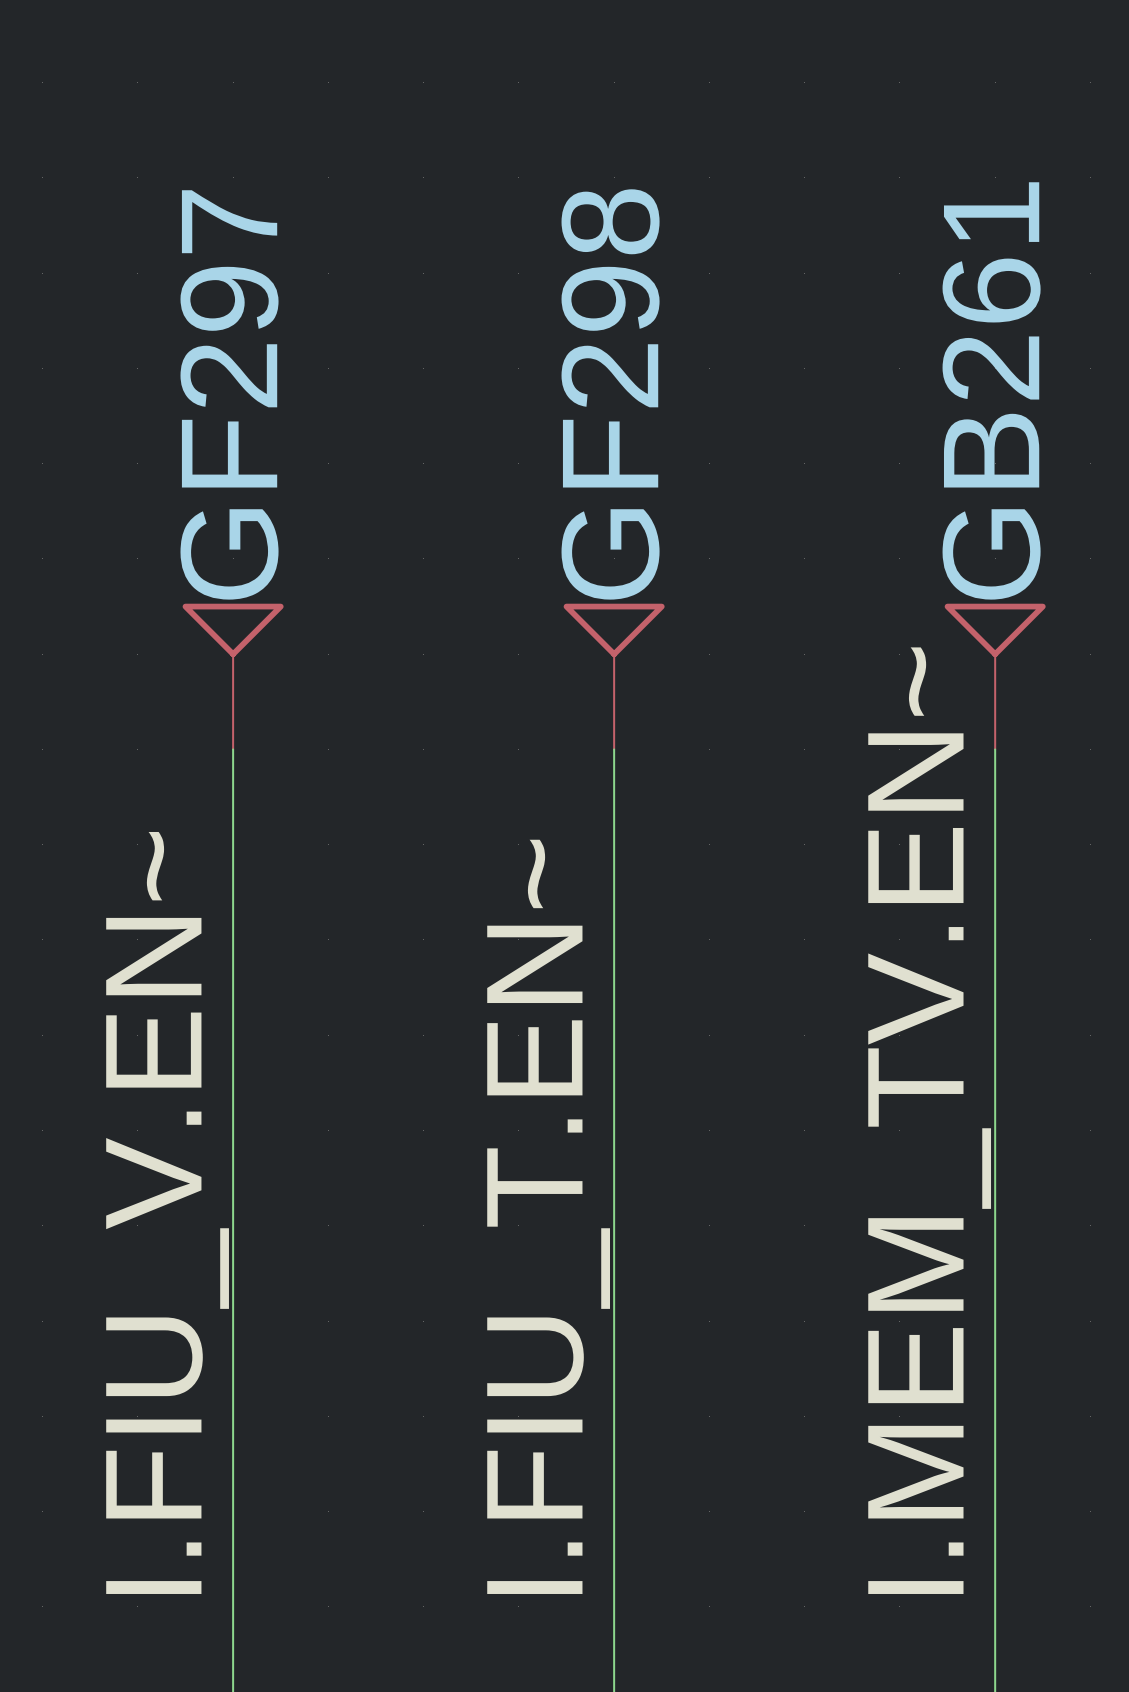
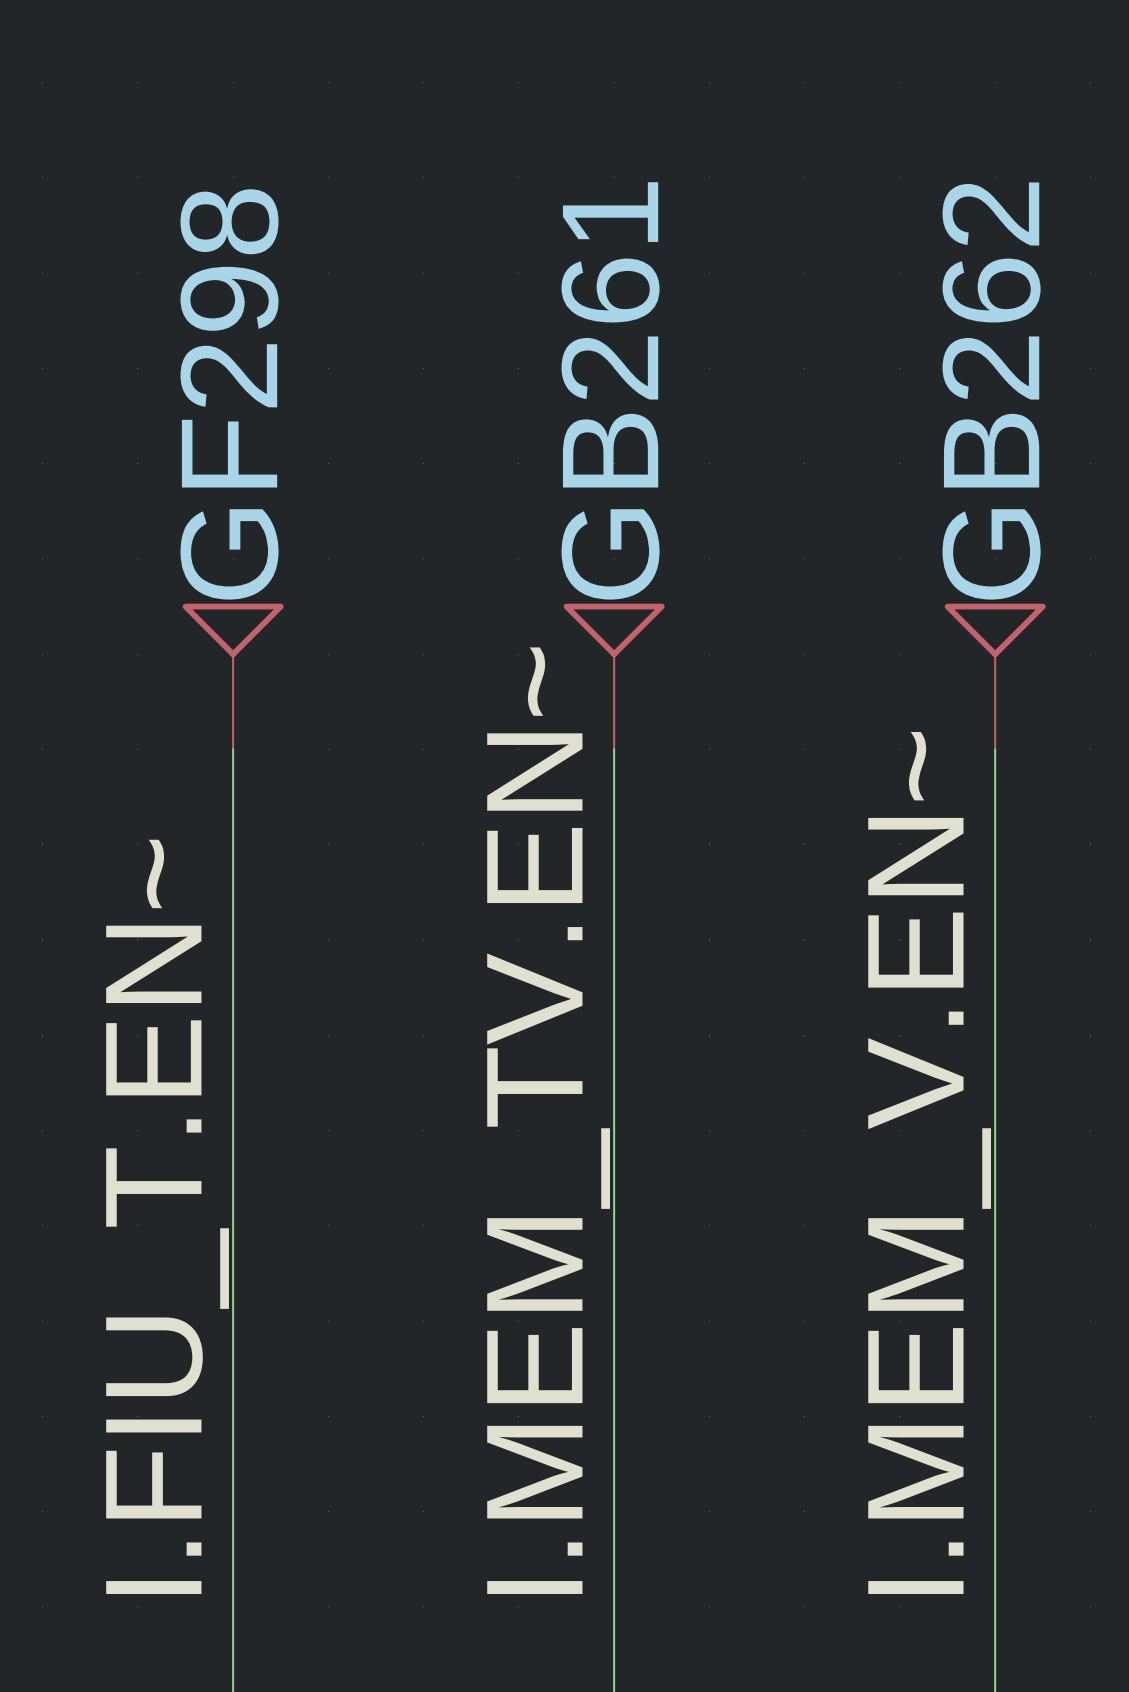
GB261 name: GB261 (991, 390) -> GB262 (991, 391)
GF297 name: GF297 (229, 394) -> GF298 (229, 394)
GF298 name: GF298 (610, 394) -> GB261 (610, 390)
label: I.MEM_TV.EN~ (929, 1120) -> I.MEM_V.EN~ (929, 1162)
label: I.FIU_V.EN~ (167, 1212) -> I.FIU_T.EN~ (167, 1216)
label: I.FIU_T.EN~ (548, 1216) -> I.MEM_TV.EN~ (548, 1120)

